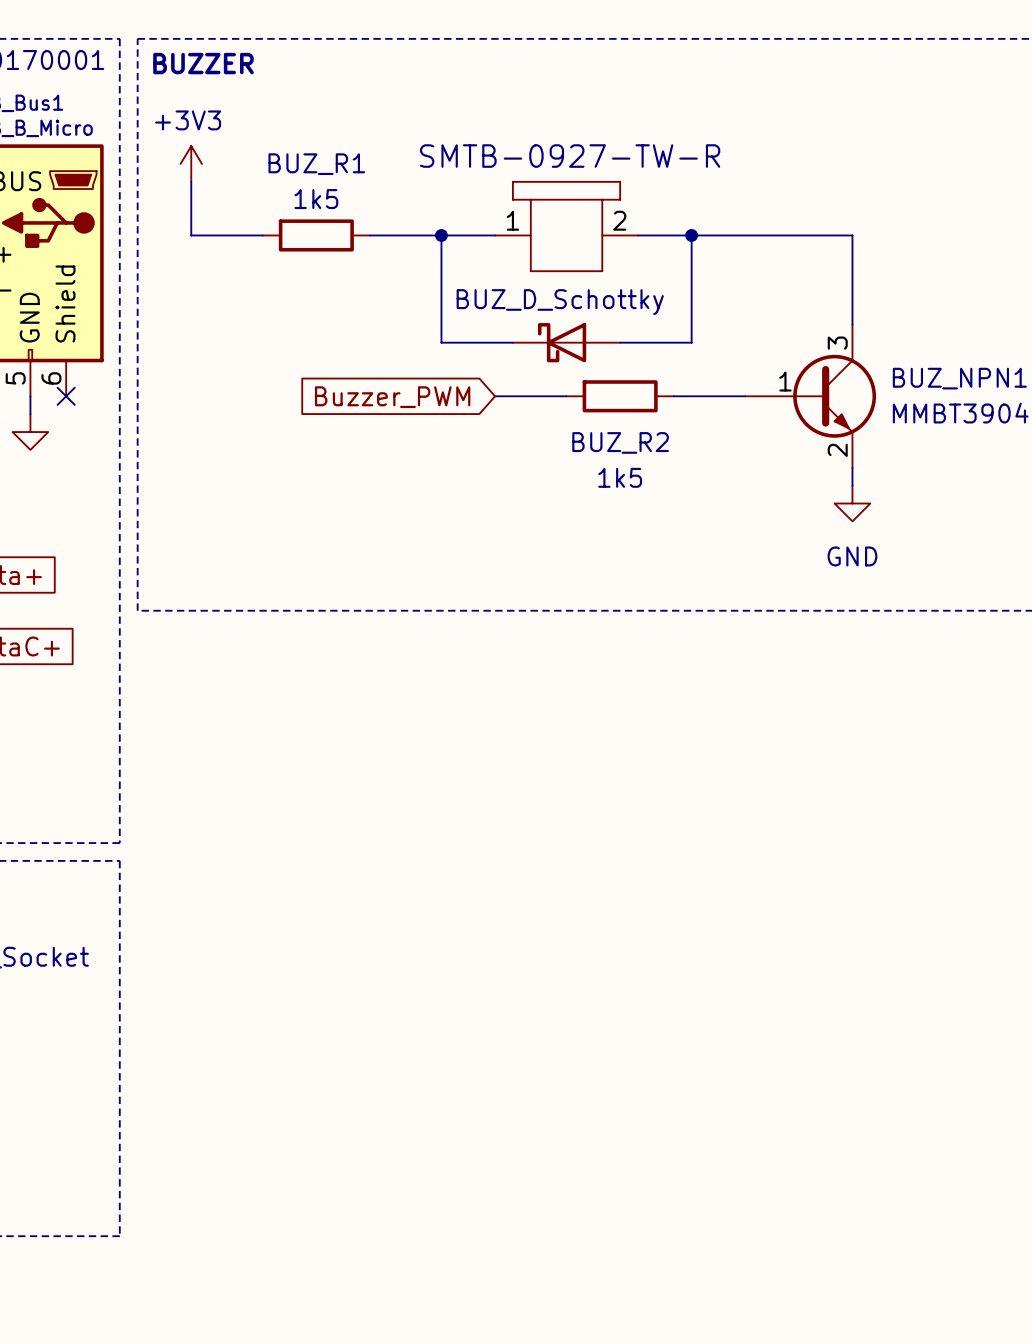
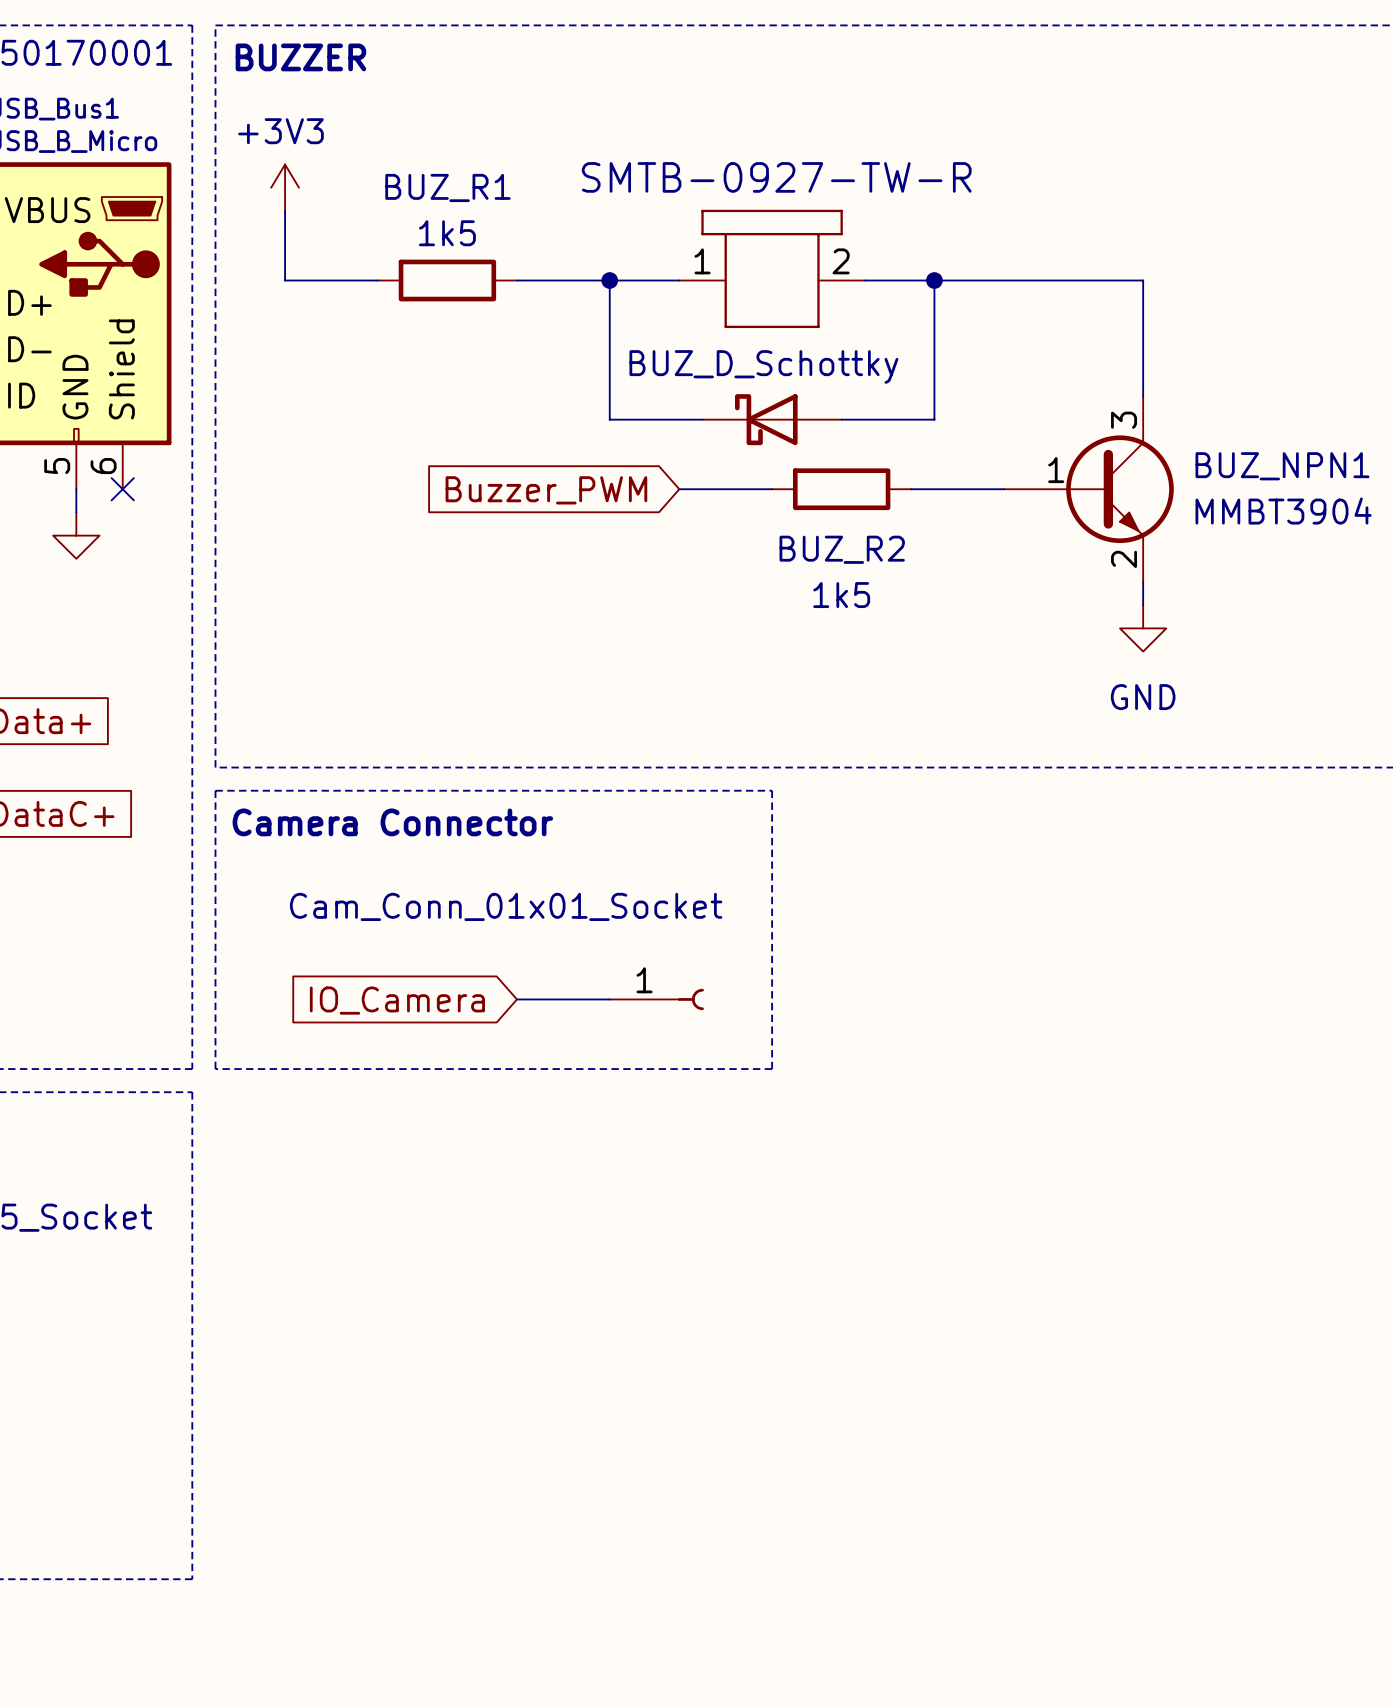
line: none -> (215, 790) (772, 790) (772, 1069) (215, 1069) (215, 790)
text: none -> Camera Connector (392, 822)
wire: none -> (516, 999) (609, 999)
part: none -> Cam_Conn_01x01_Socket (656, 999)
global label: none -> IO_Camera (397, 1000)

